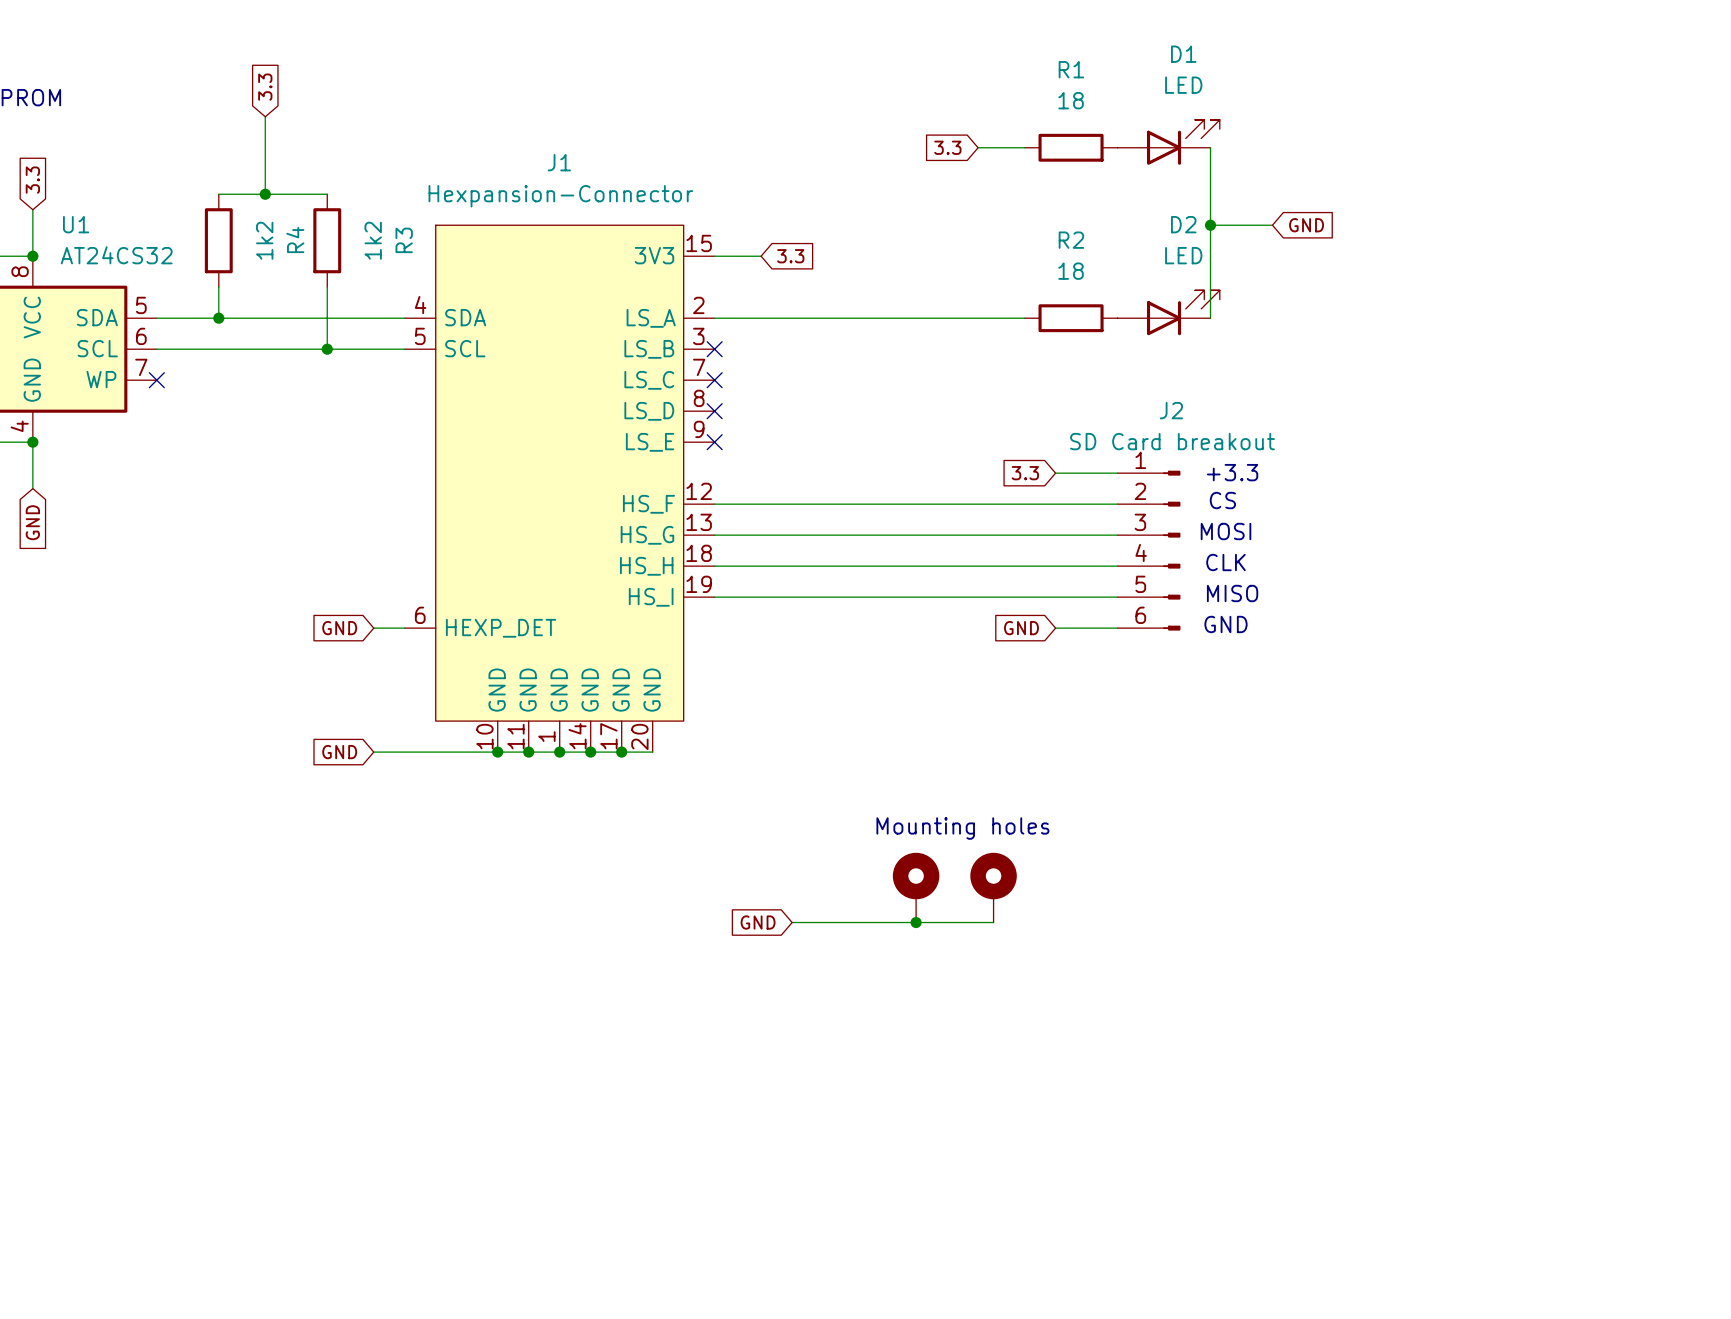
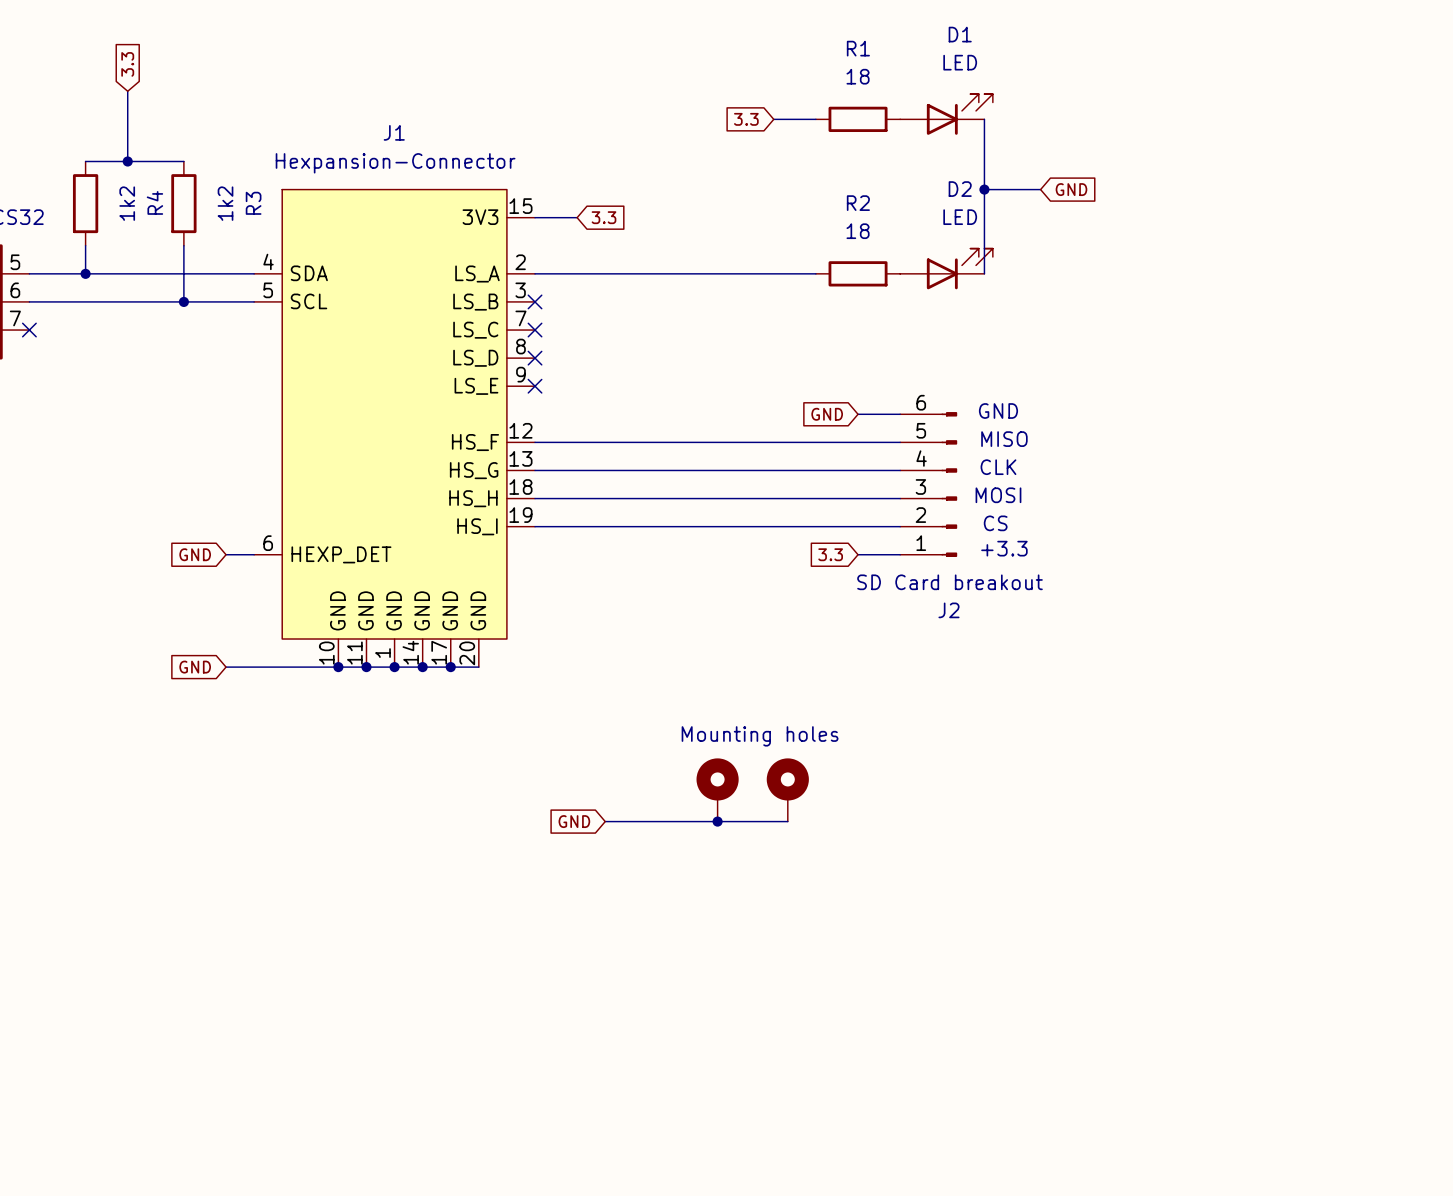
text: +3.3 (1232, 472) -> GND (998, 411)
global label position: 3.3 (1025, 473) -> 3.3 (830, 554)
wire: (1055, 473) (1071, 473) -> none
text: CS (1222, 500) -> MISO (1004, 439)
text: MOSI (1226, 531) -> CLK (998, 467)
J2 flip: as is (1171, 550) -> up-down (949, 484)
text: CLK (1226, 562) -> MOSI (998, 495)
text: MISO (1232, 593) -> CS (995, 523)
text: GND (1226, 624) -> +3.3 (1004, 548)
global label position: GND (1021, 628) -> GND (827, 414)
wire: (1055, 628) (1071, 628) -> none

